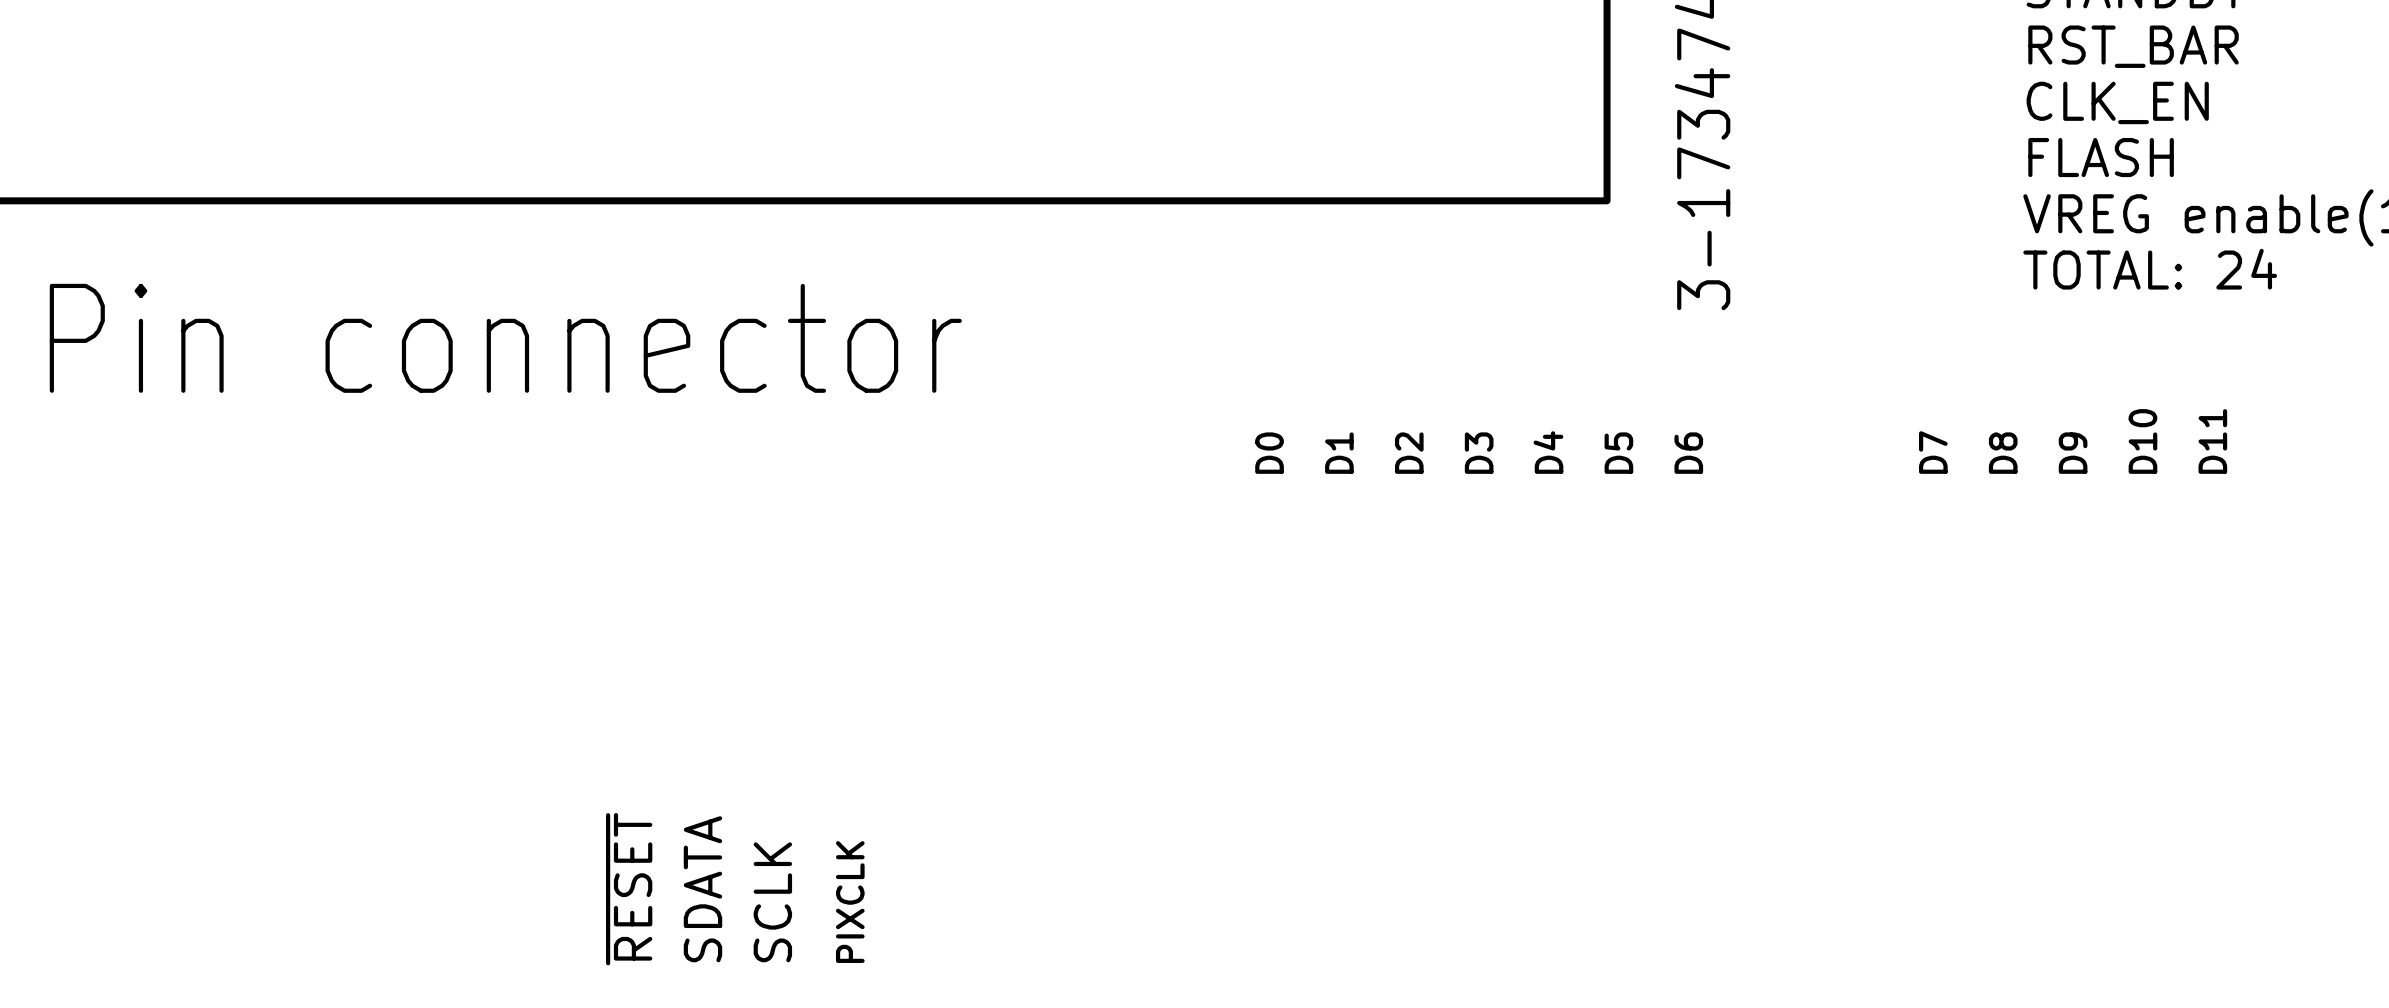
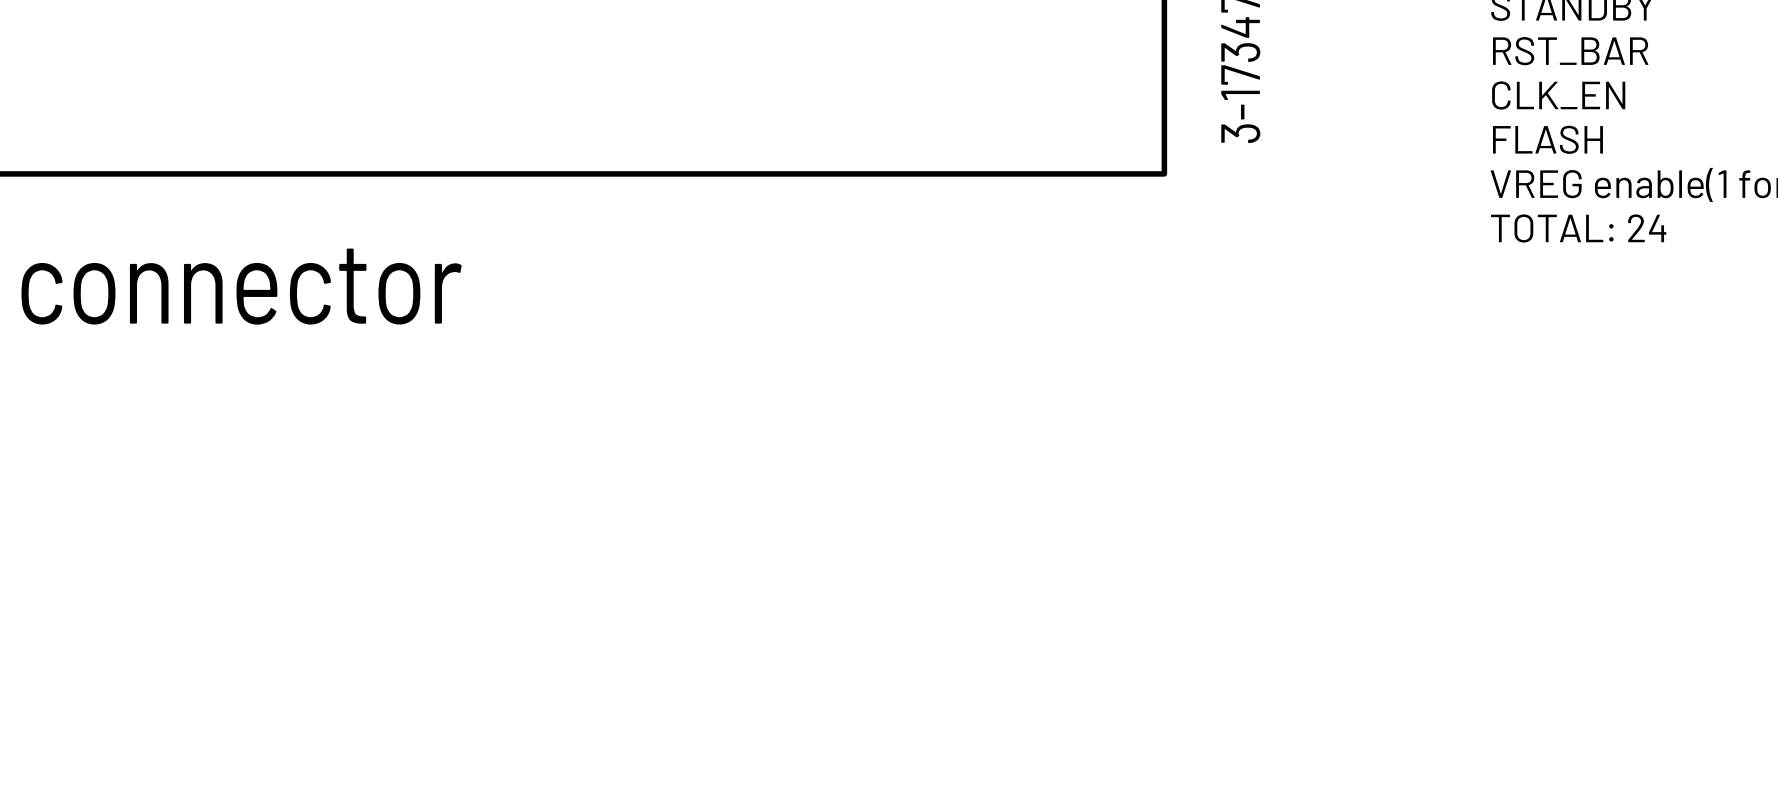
label: D10 (2142, 441) -> none
label: D11 (2212, 441) -> none
label: D4 (1548, 452) -> none
label: D7 (1933, 452) -> none
label: D0 (1269, 453) -> none
label: D1 (1339, 453) -> none
label: D2 (1409, 453) -> none
label: D3 (1479, 453) -> none
label: D5 (1618, 453) -> none
label: D6 (1688, 453) -> none
label: D8 (2003, 453) -> none
label: D9 (2073, 453) -> none
label: ~{RESET} (629, 889) -> none
label: SDATA (702, 889) -> none
label: SCLK (772, 902) -> none
label: PIXCLK (850, 902) -> none

